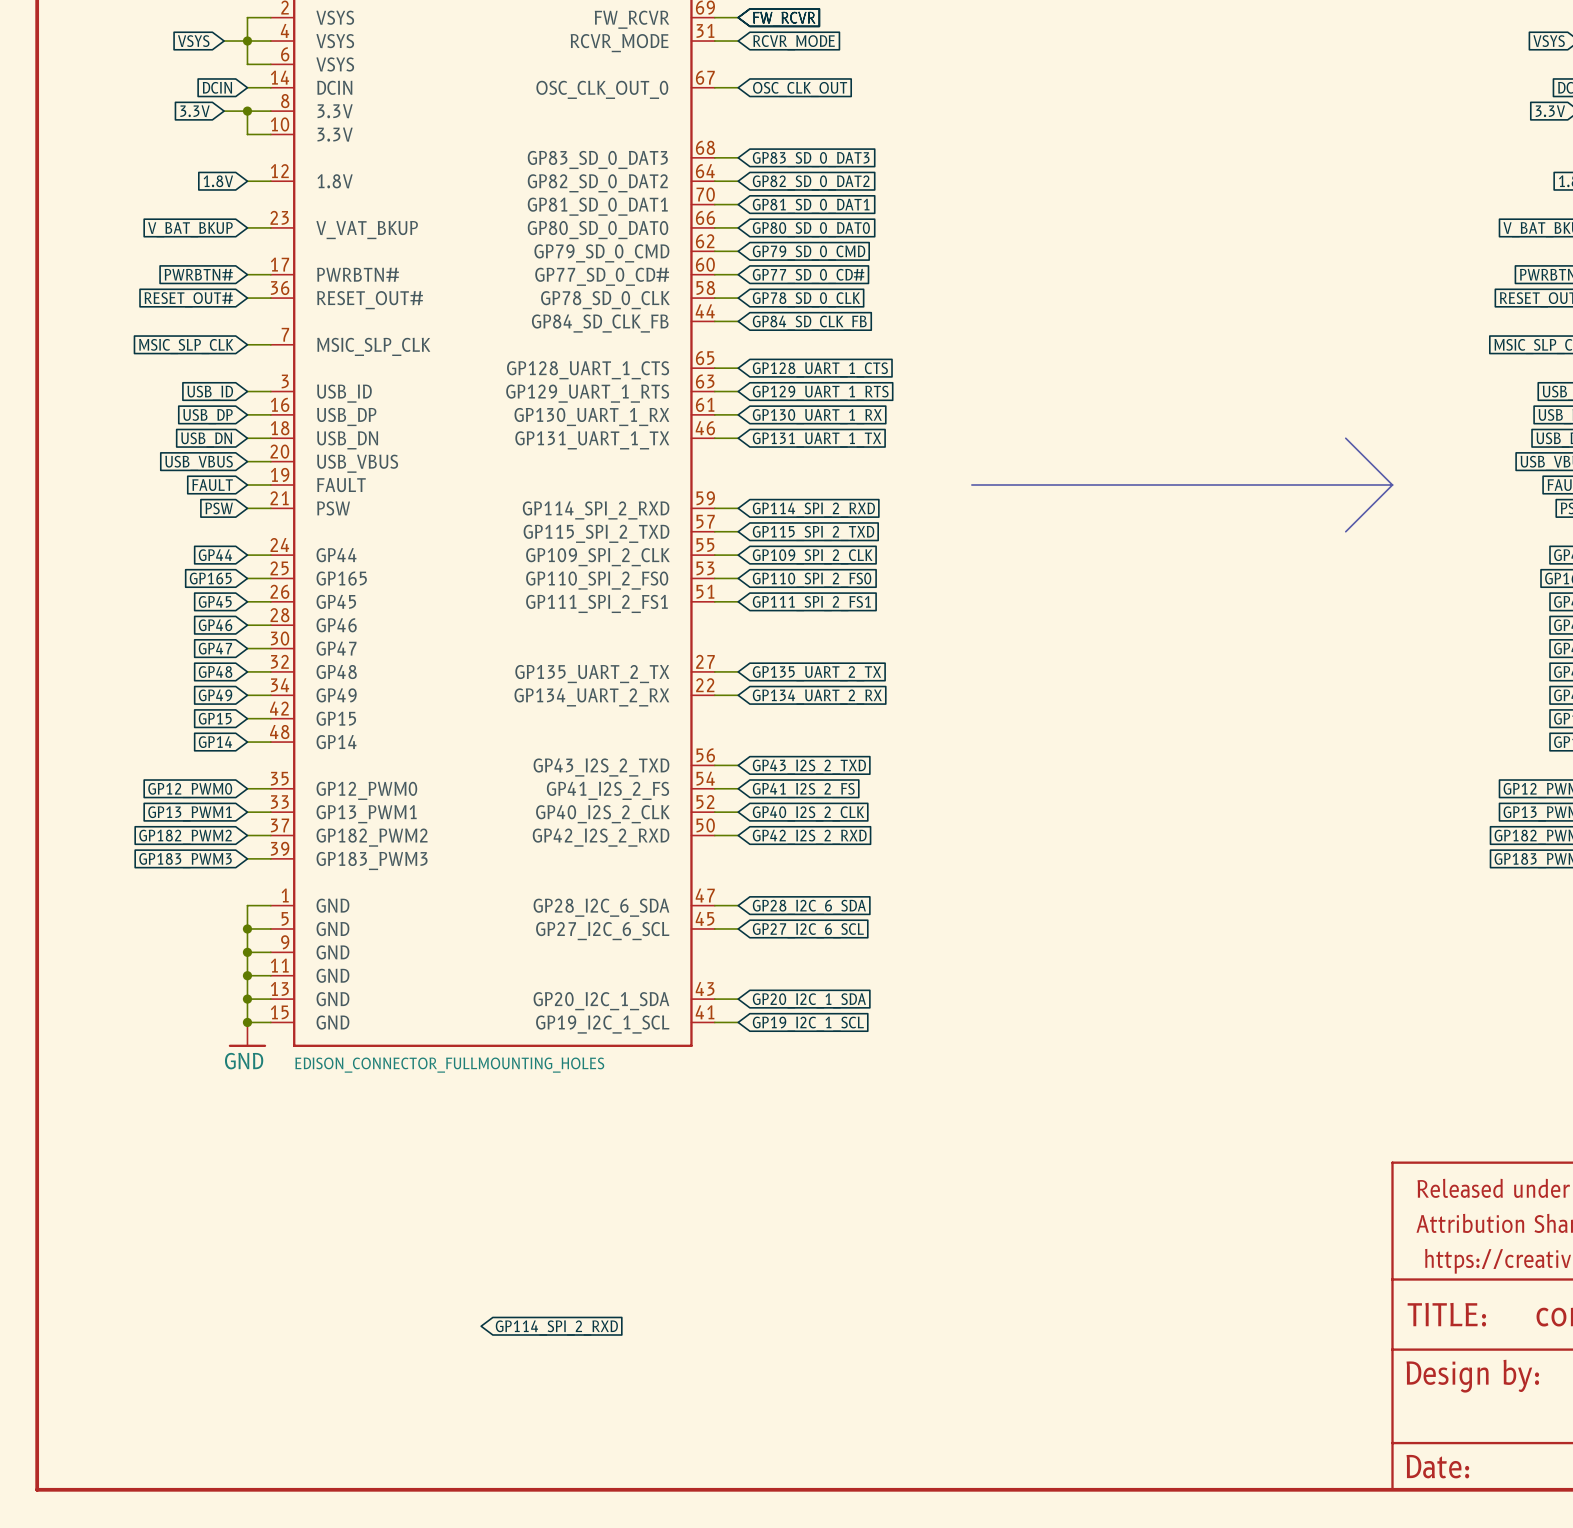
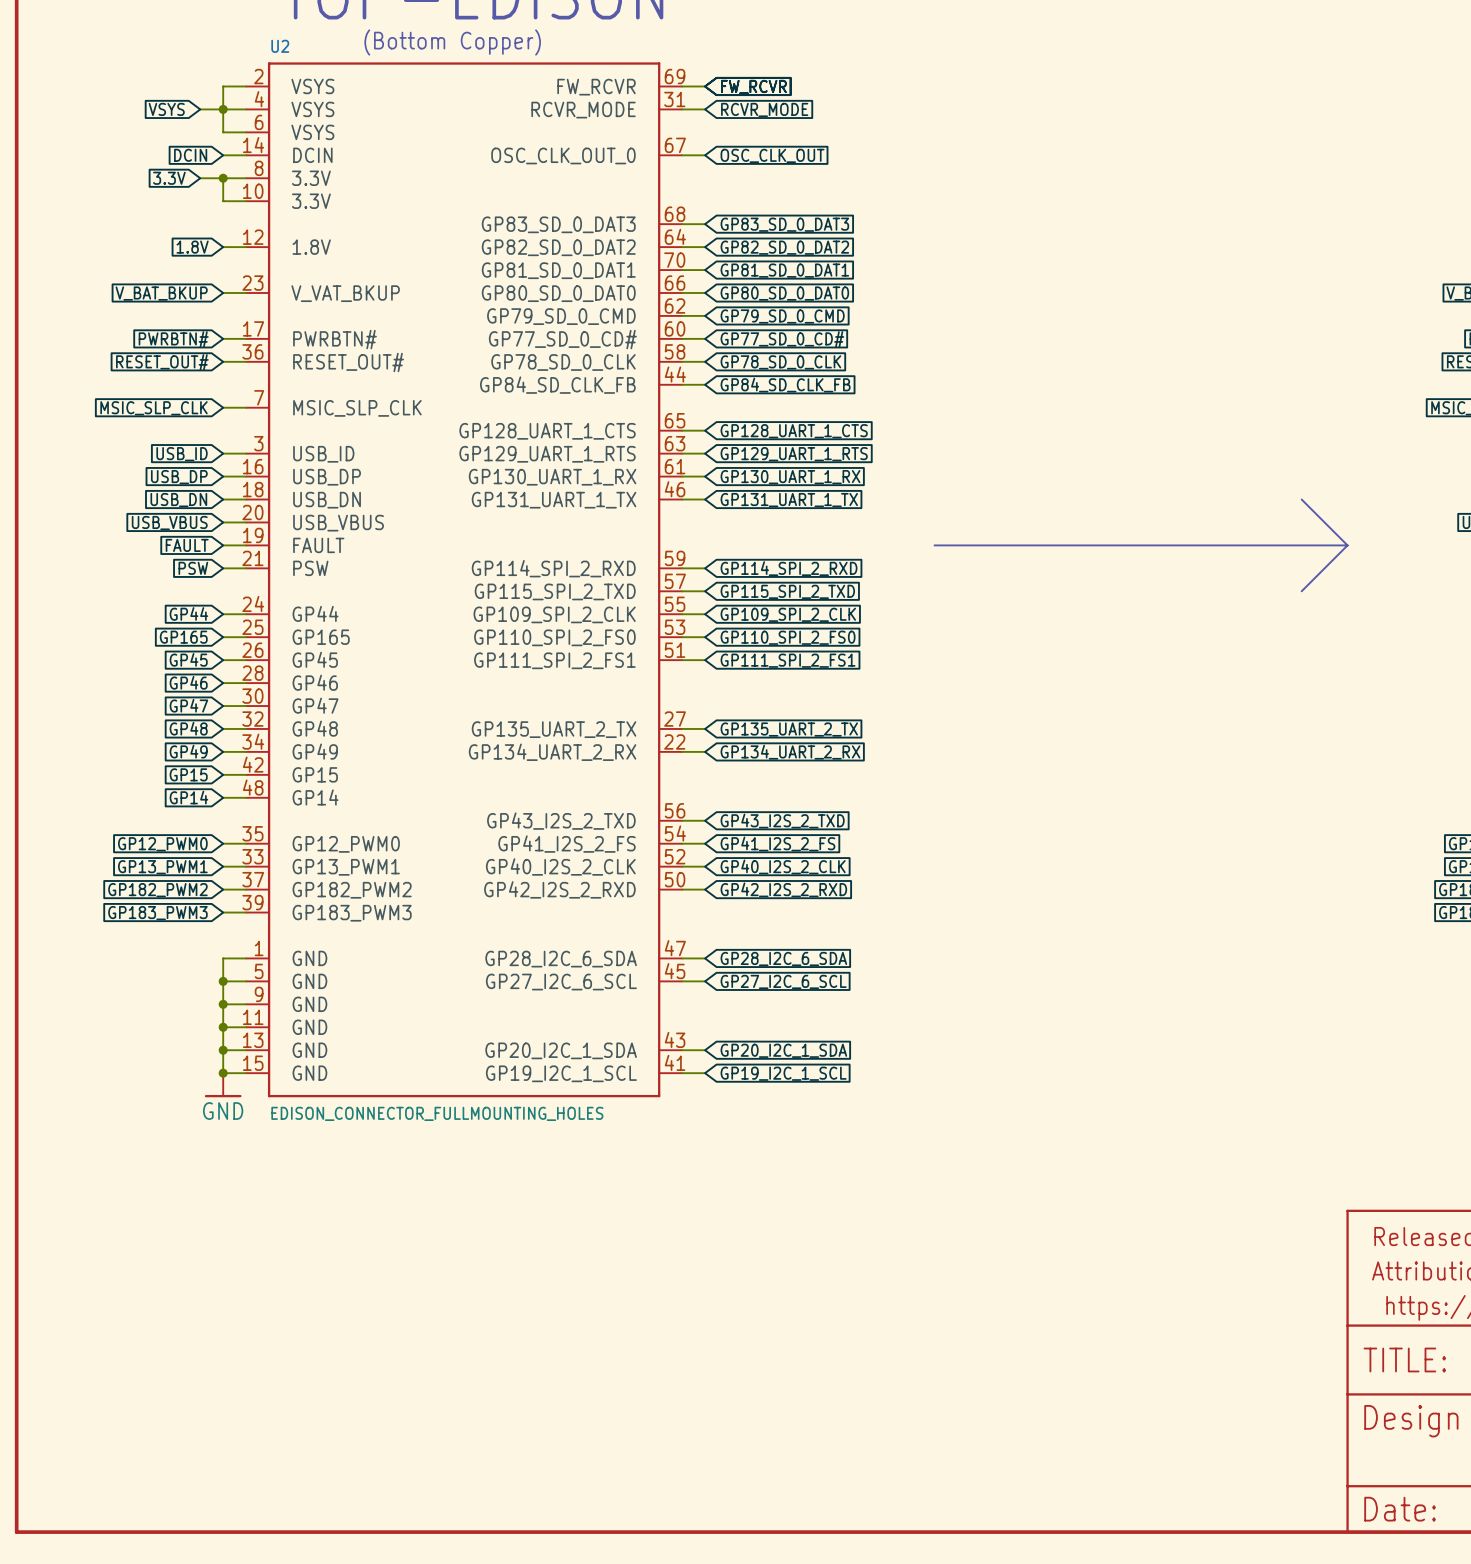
global label: GP114_SPI_2_RXD (556, 1327) -> none

